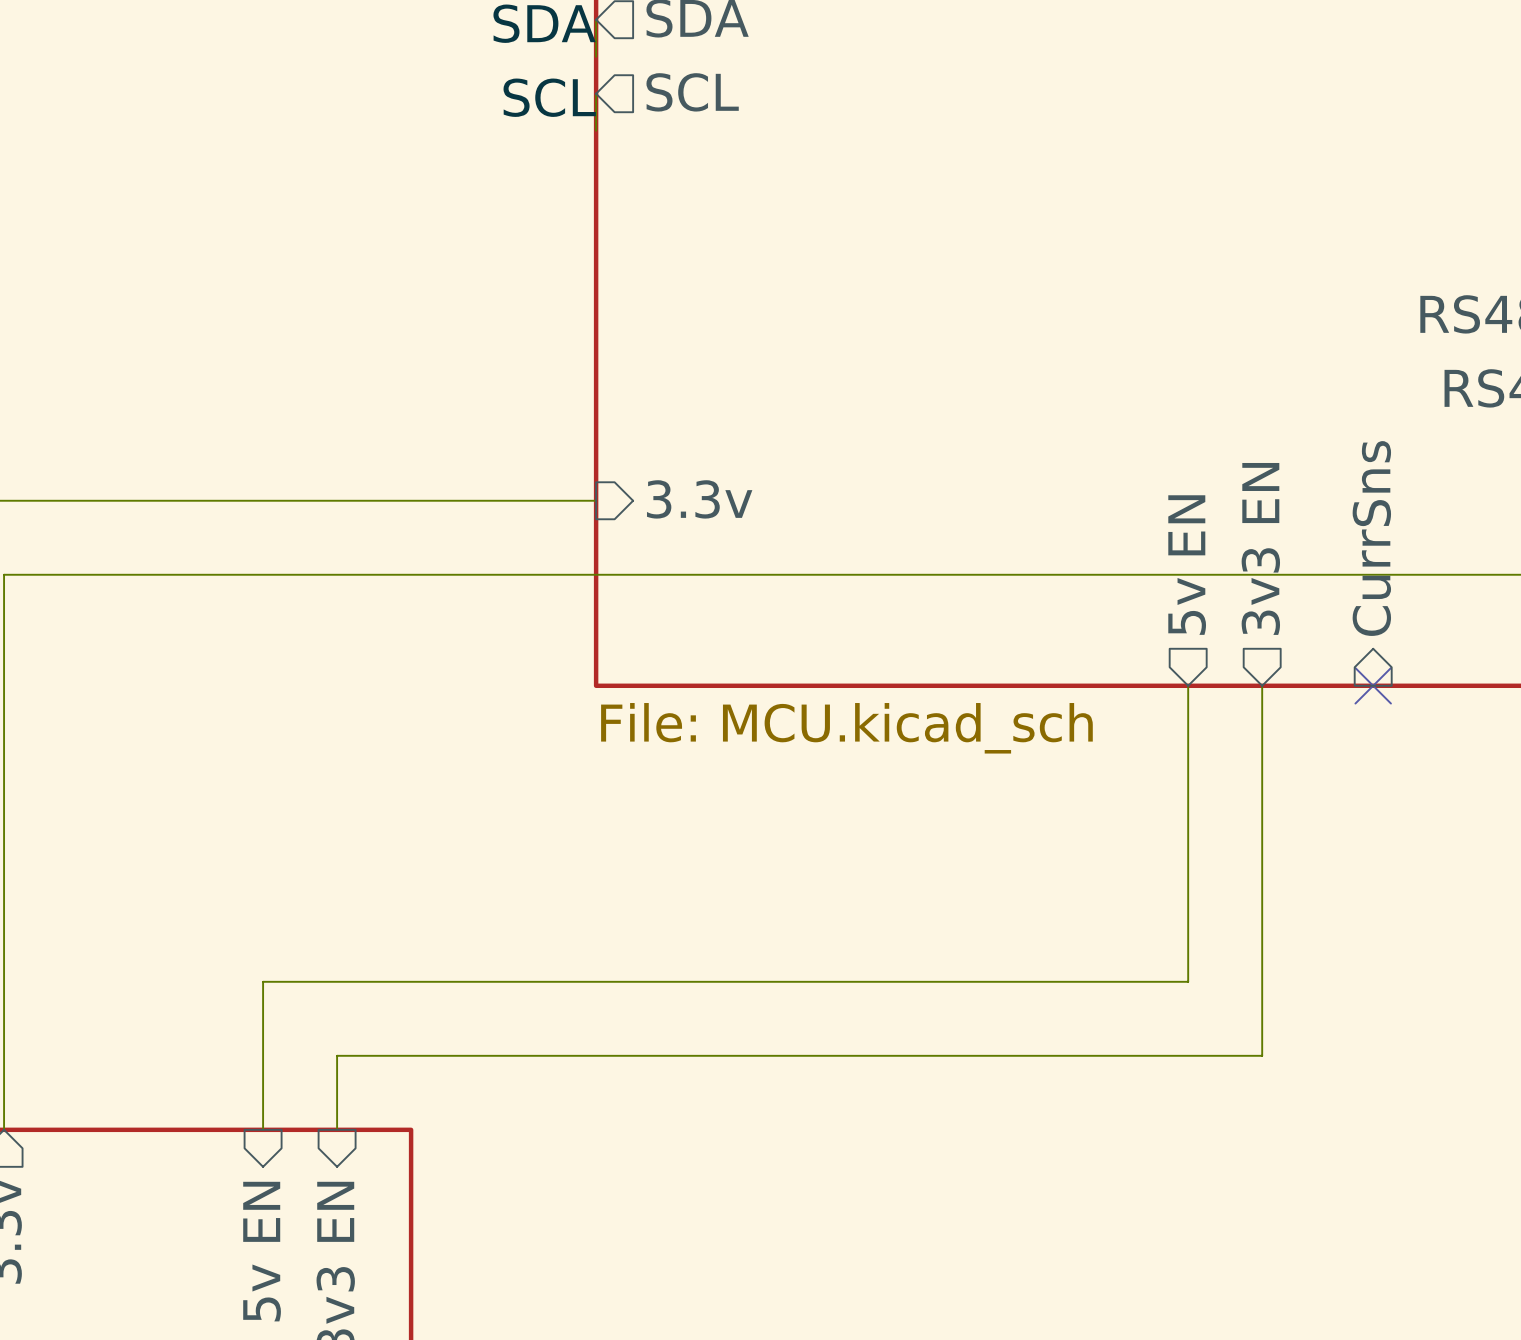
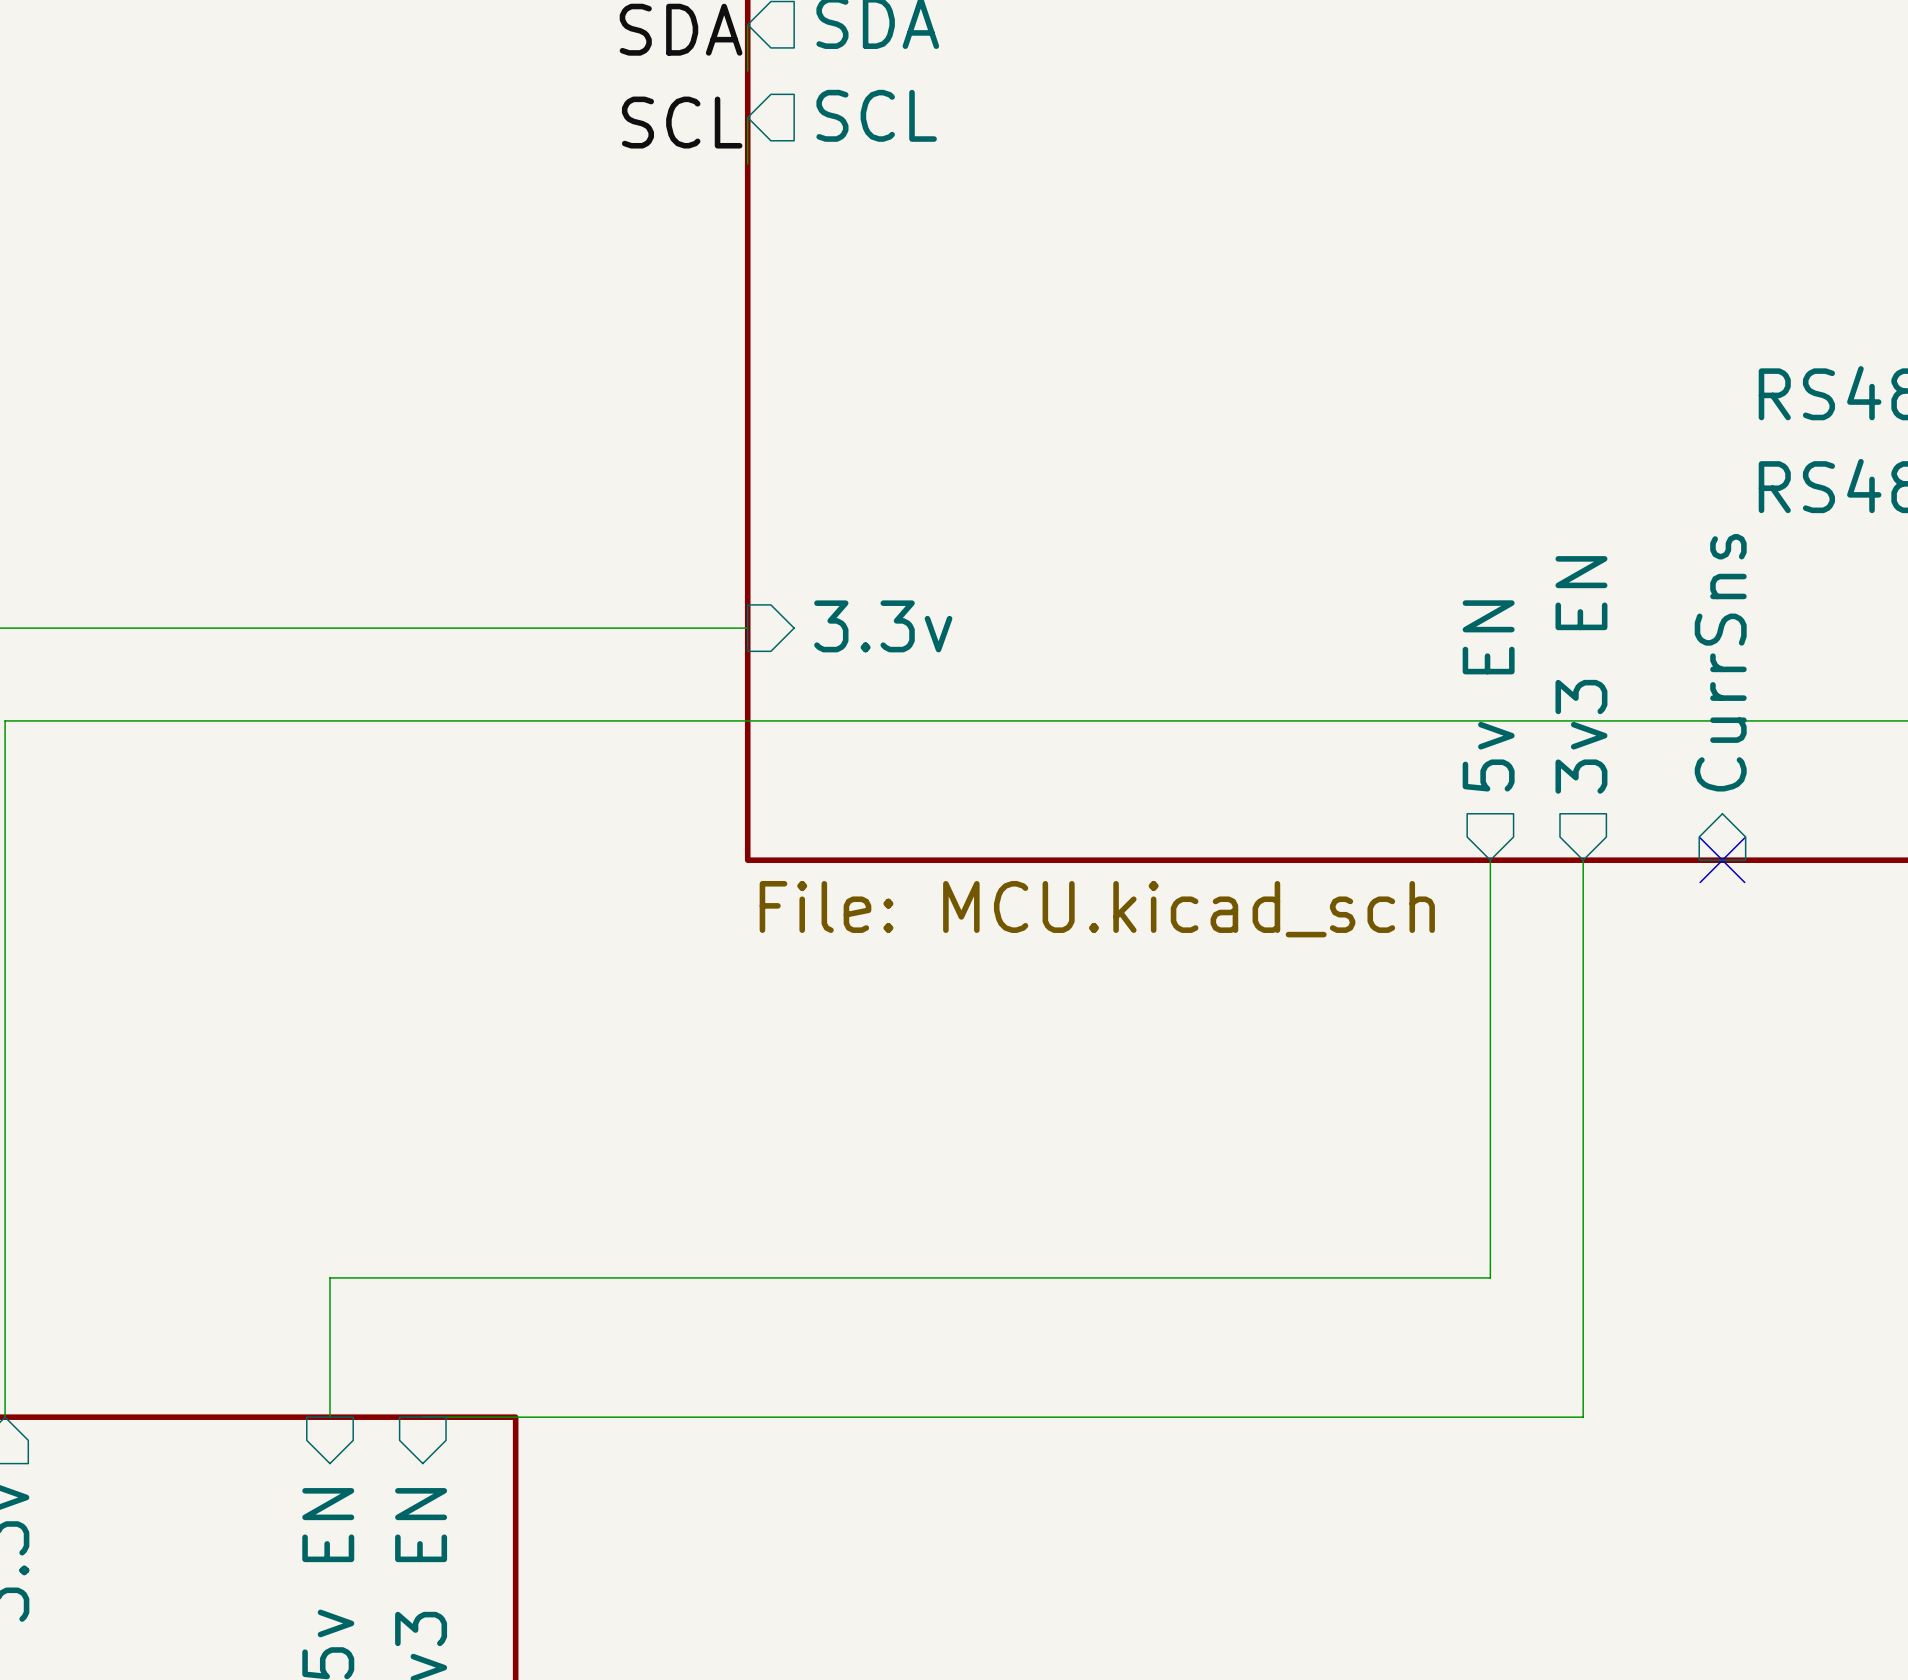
wire: (1188, 981) (263, 981) (263, 1018) -> (1490, 1231) (1490, 1277) (329, 1277)
wire: (1262, 1055) (337, 1055) (337, 1129) -> (1583, 1324) (1583, 1417) (422, 1417)

